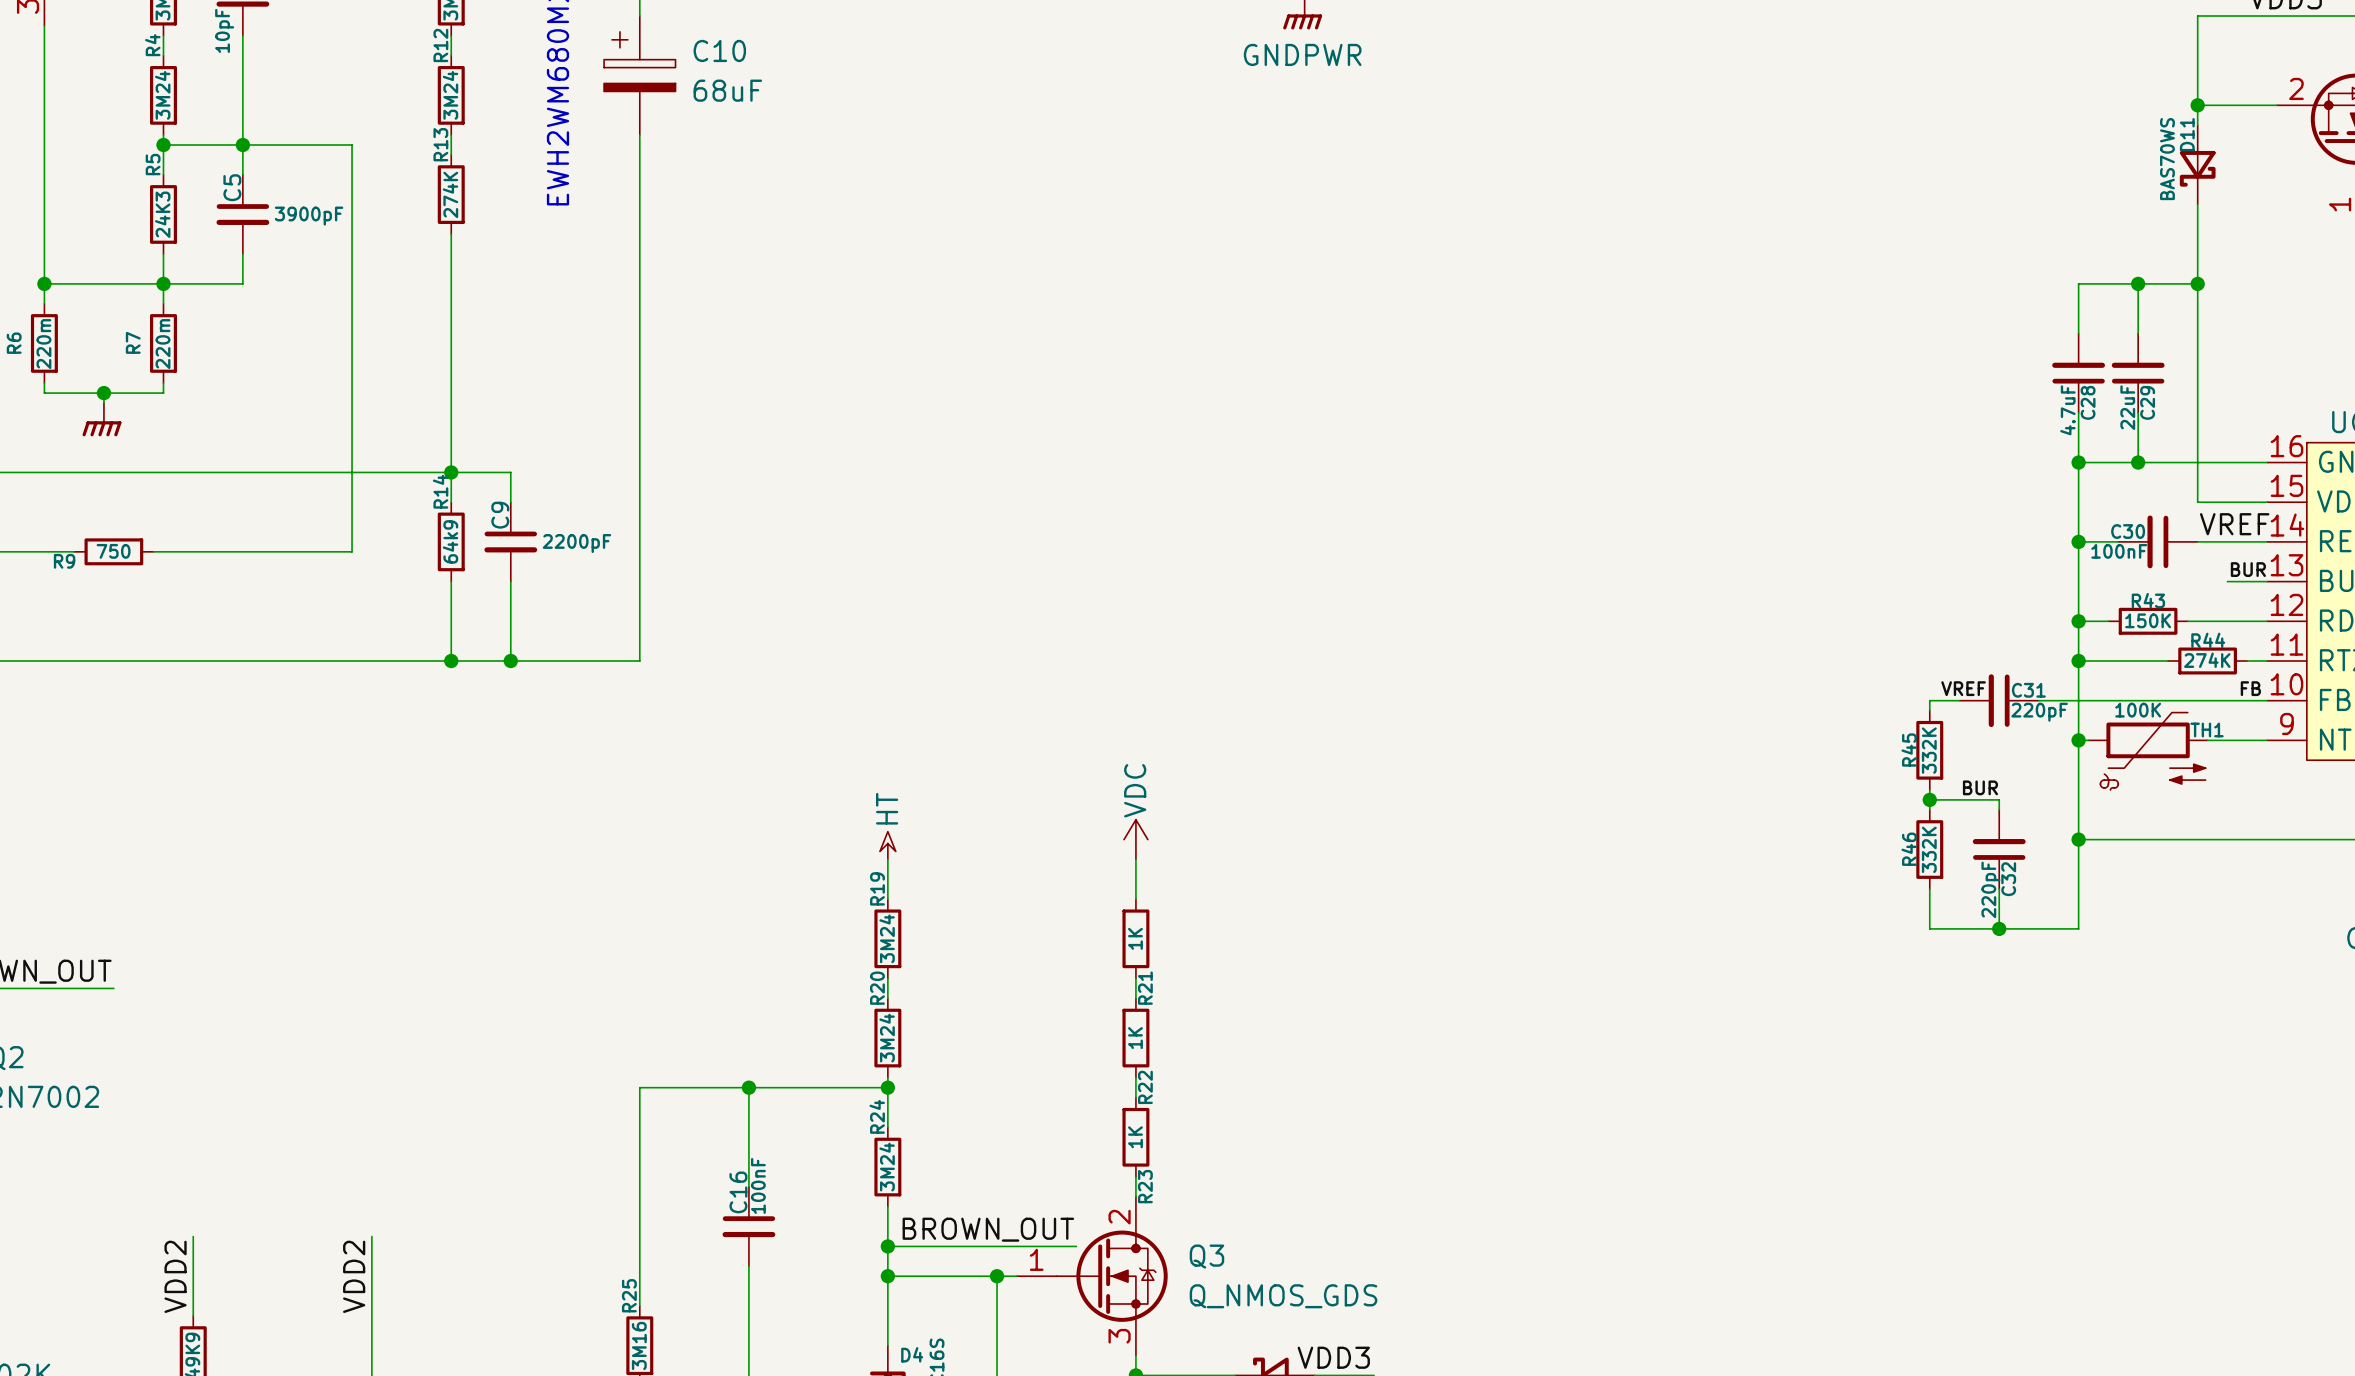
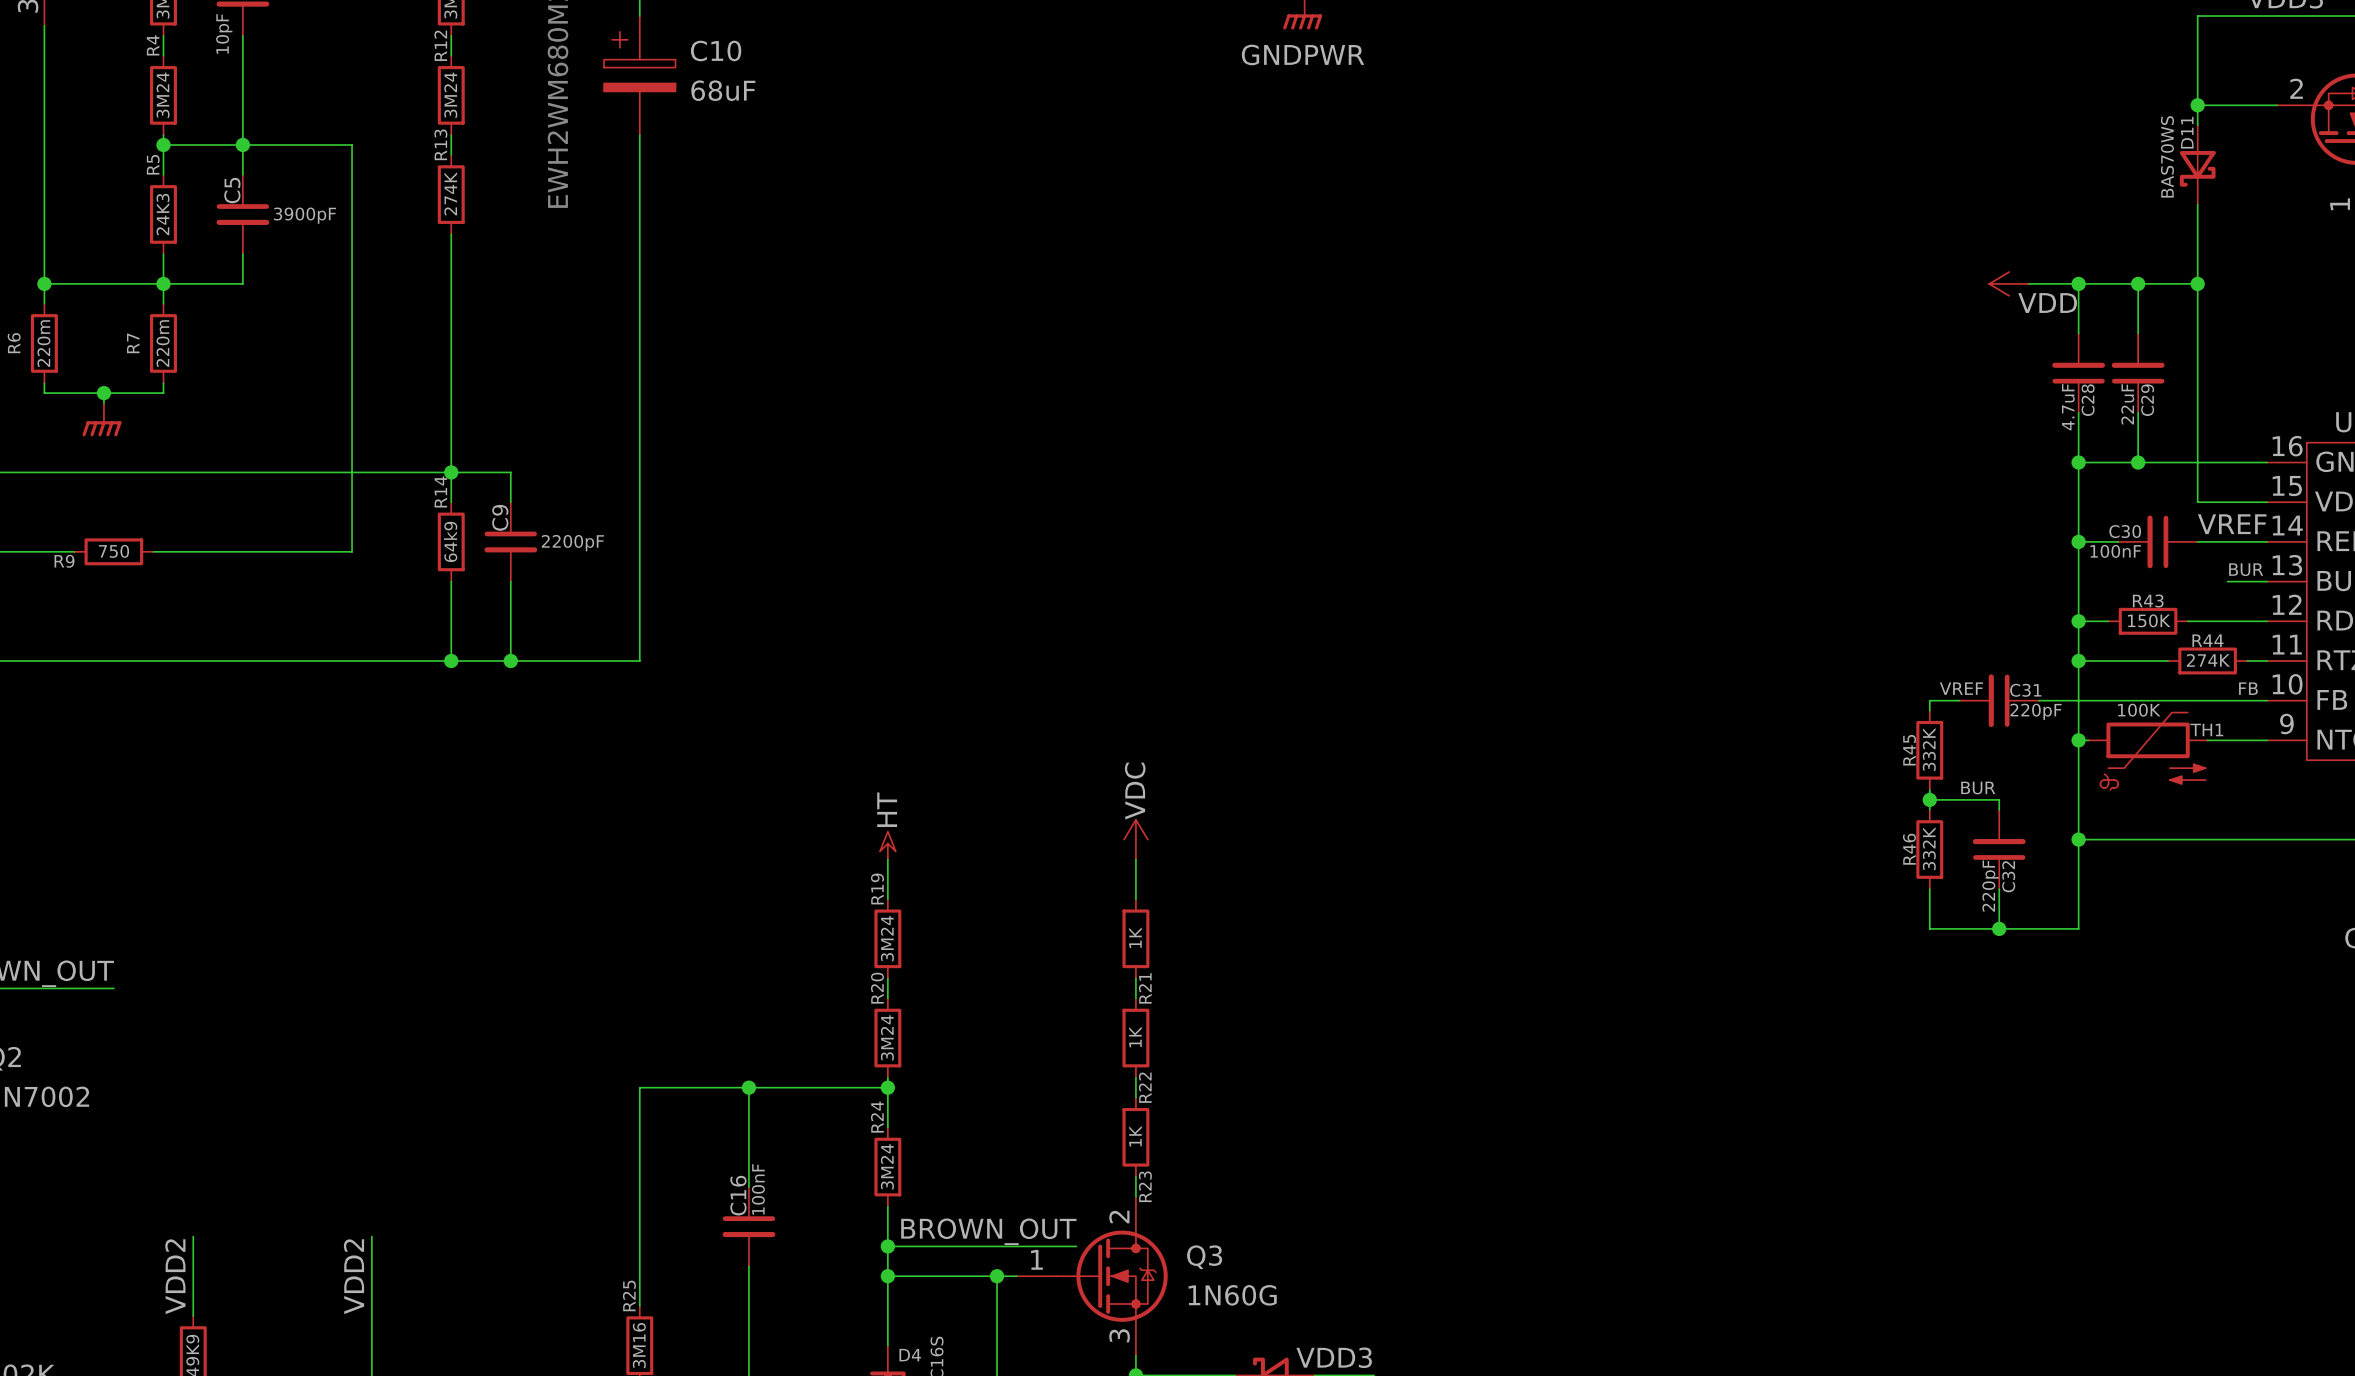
power symbol: none -> VDD (2009, 283)
wire: none -> (2029, 283) (2078, 283)
junction: none -> (2078, 283)
Q3 value: Q_NMOS_GDS (1283, 1296) -> 1N60G (1232, 1295)

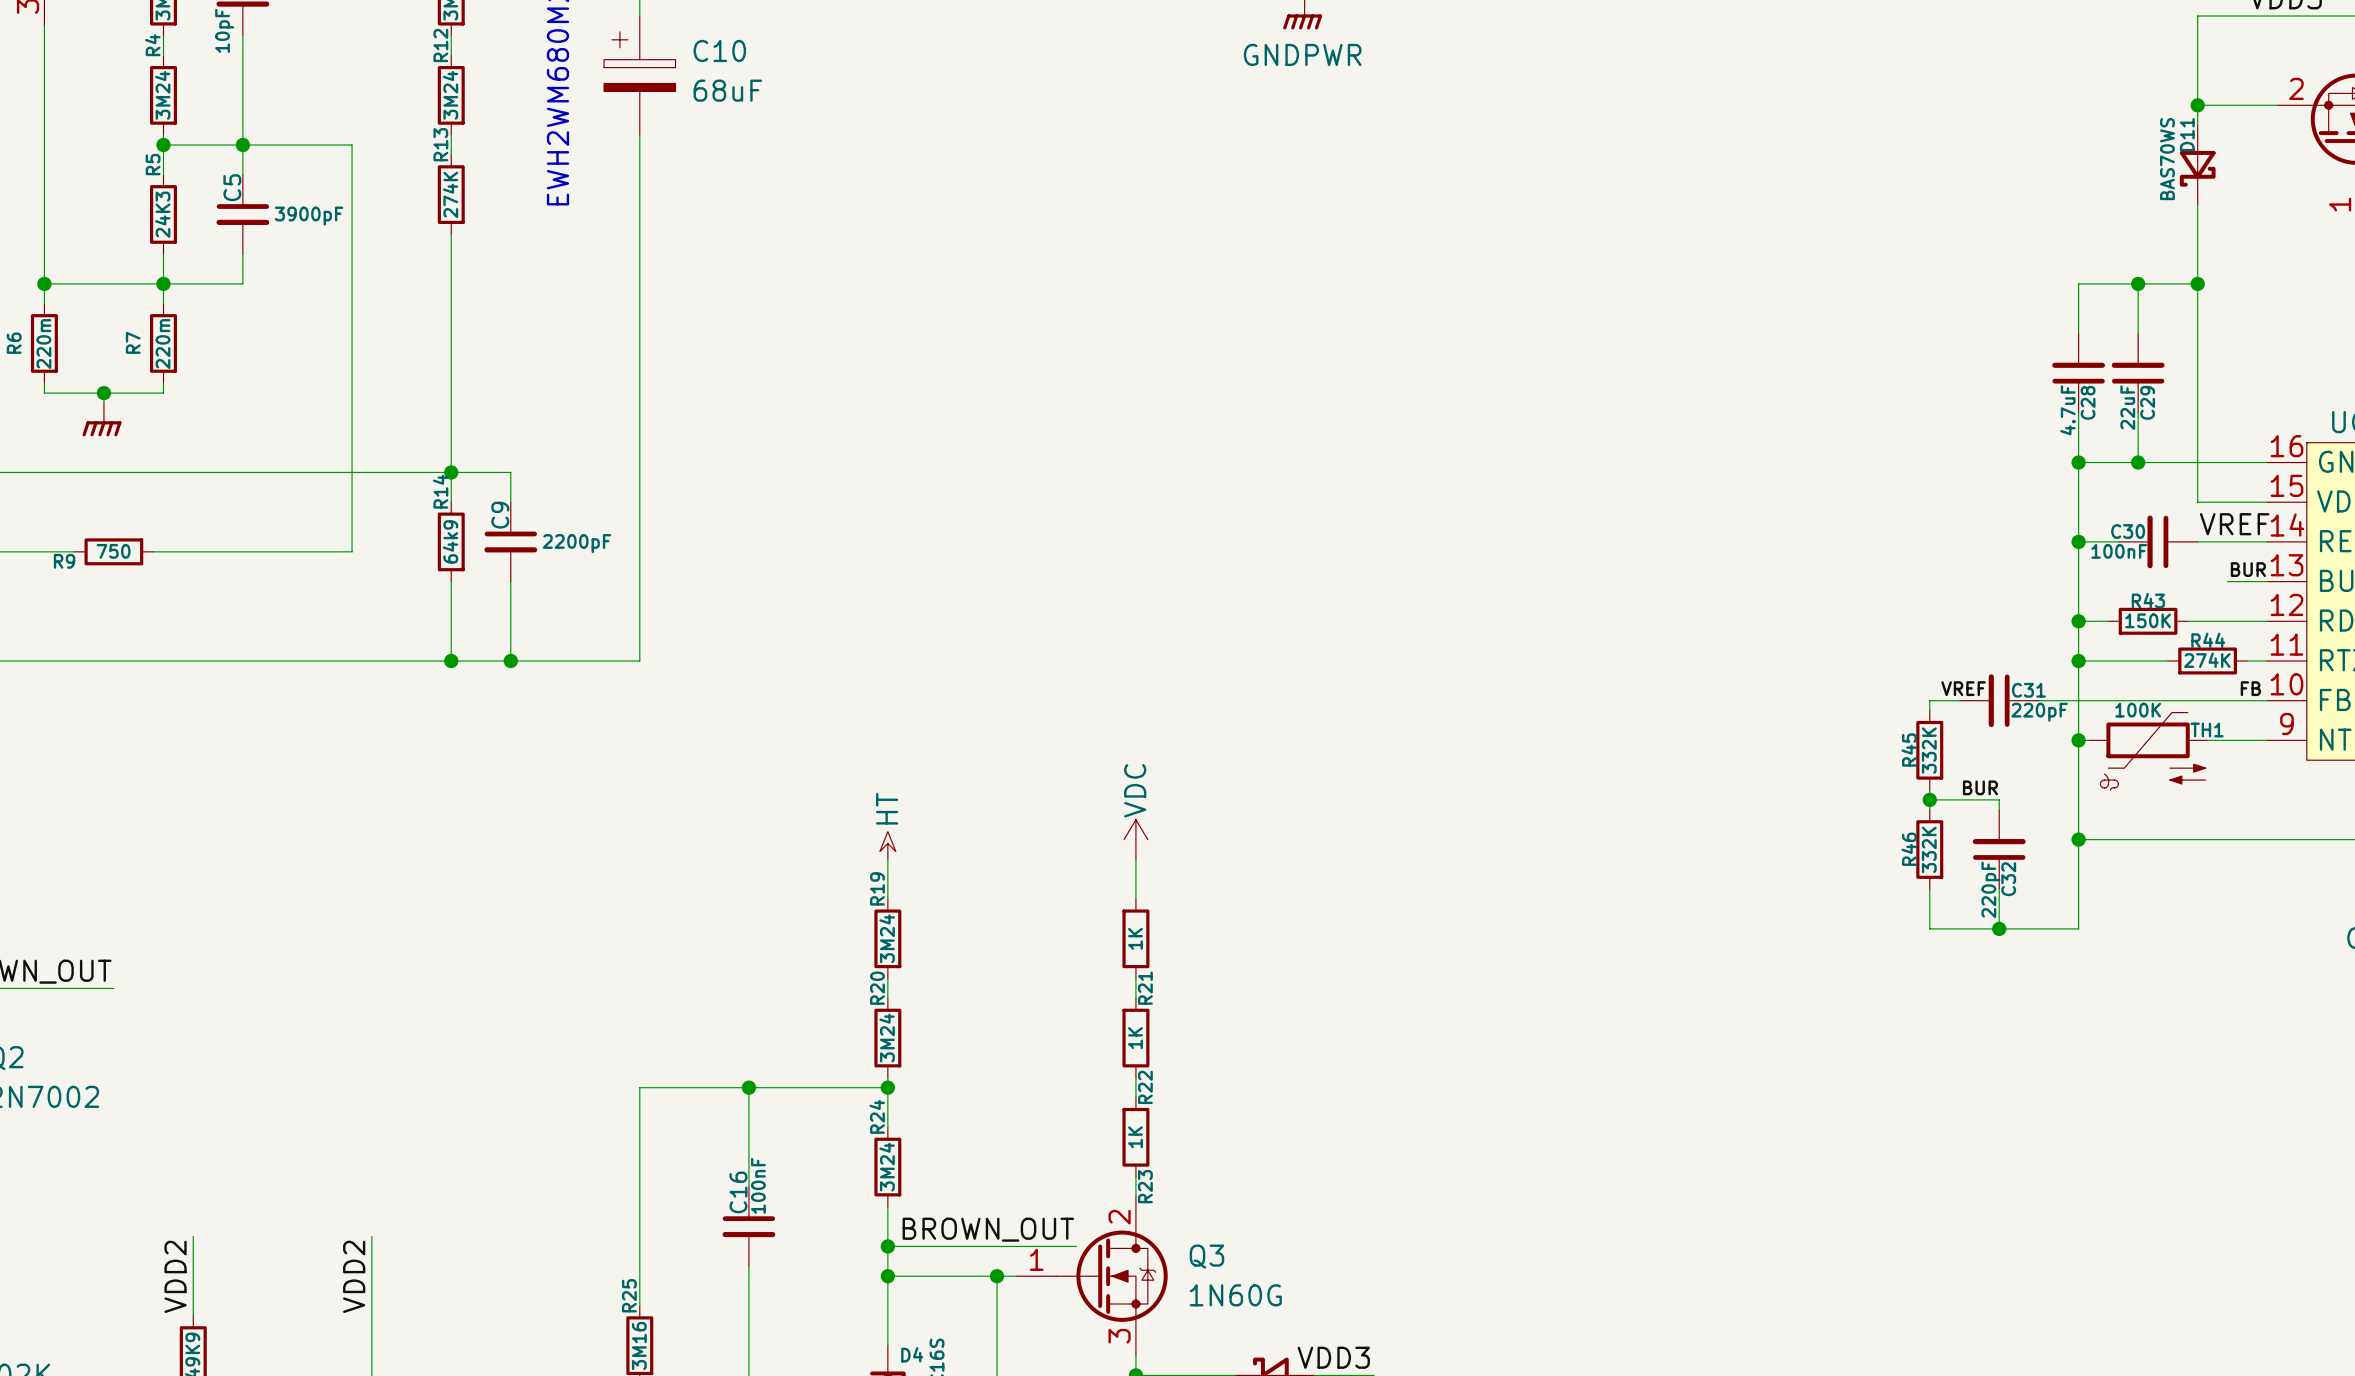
power symbol: VDD (2009, 283) -> none
wire: (2029, 283) (2078, 283) -> none
junction: (2078, 283) -> none

